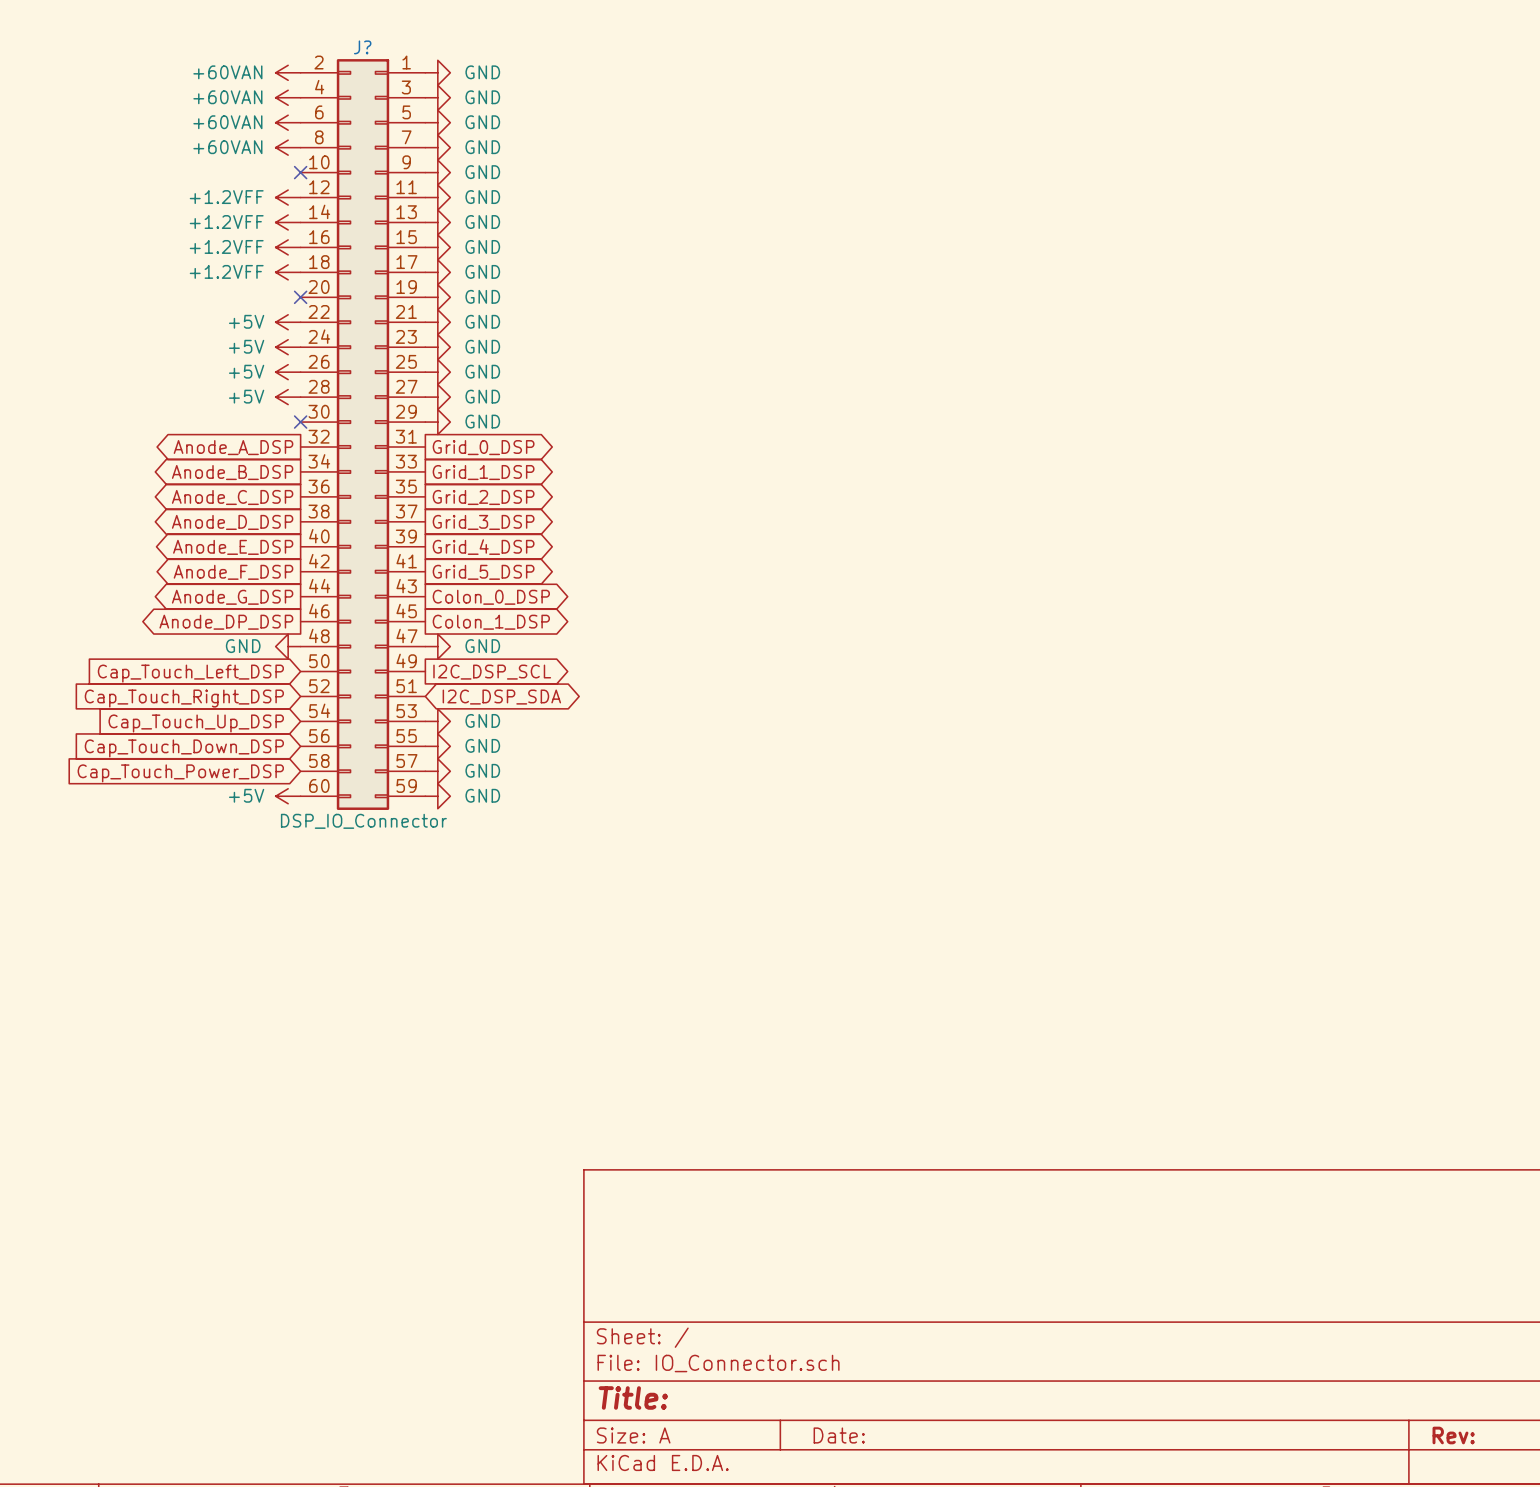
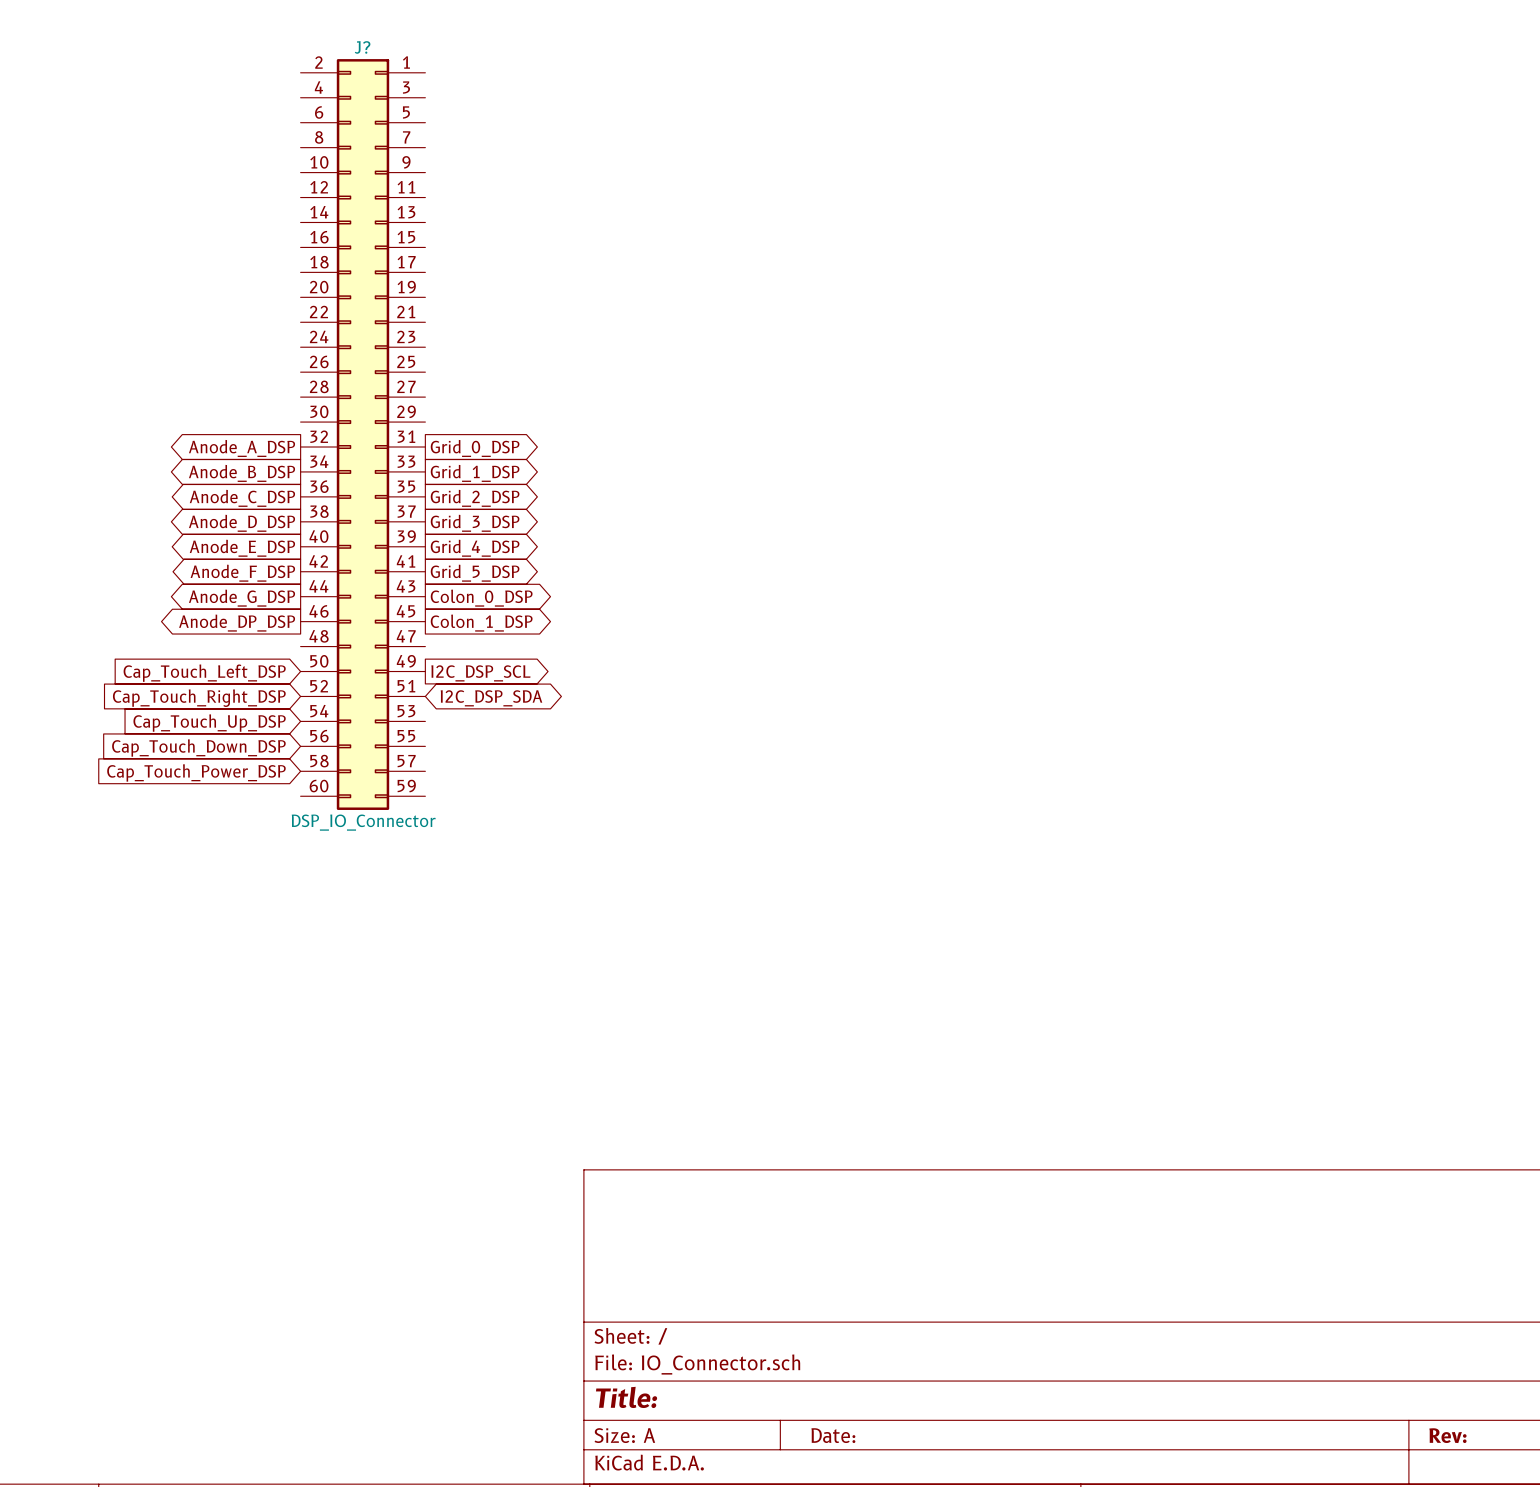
power symbol: +60VAN (288, 72) -> none
power symbol: GND (437, 72) -> none
power symbol: +60VAN (288, 97) -> none
power symbol: GND (437, 97) -> none
power symbol: +60VAN (288, 122) -> none
power symbol: GND (437, 122) -> none
power symbol: +60VAN (288, 147) -> none
power symbol: GND (437, 147) -> none
no-connect mark: (300, 172) -> none
power symbol: GND (437, 172) -> none
power symbol: +1.2VFF (288, 197) -> none
power symbol: GND (437, 197) -> none
power symbol: +1.2VFF (288, 222) -> none
power symbol: GND (437, 222) -> none
power symbol: +1.2VFF (288, 247) -> none
power symbol: GND (437, 247) -> none
power symbol: +1.2VFF (288, 272) -> none
power symbol: GND (437, 272) -> none
no-connect mark: (300, 297) -> none
power symbol: GND (437, 297) -> none
power symbol: +5V (288, 322) -> none
power symbol: GND (437, 322) -> none
power symbol: +5V (288, 347) -> none
power symbol: GND (437, 347) -> none
power symbol: +5V (288, 372) -> none
power symbol: GND (437, 372) -> none
power symbol: +5V (288, 397) -> none
power symbol: GND (437, 397) -> none
no-connect mark: (300, 422) -> none
power symbol: GND (437, 422) -> none
power symbol: GND (288, 646) -> none
power symbol: GND (437, 646) -> none
power symbol: GND (437, 721) -> none
power symbol: GND (437, 746) -> none
power symbol: GND (437, 771) -> none
power symbol: +5V (288, 796) -> none
power symbol: GND (437, 796) -> none

